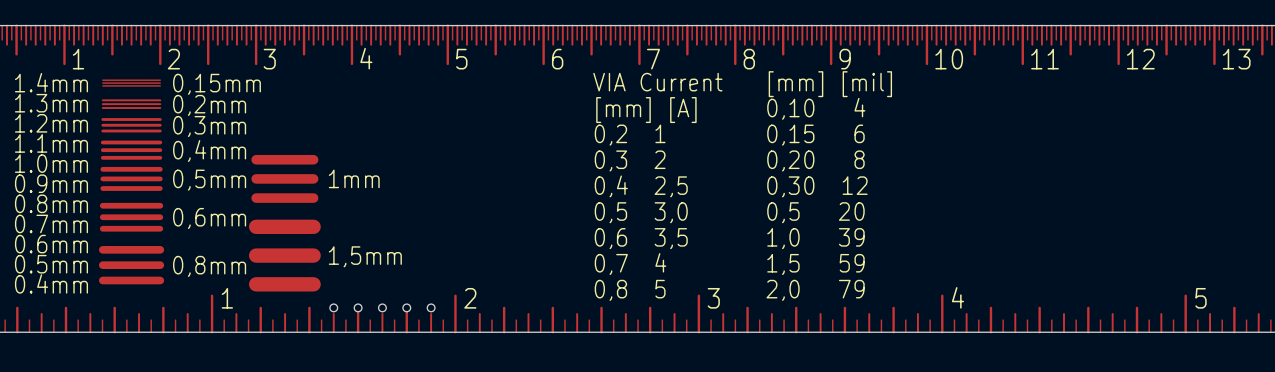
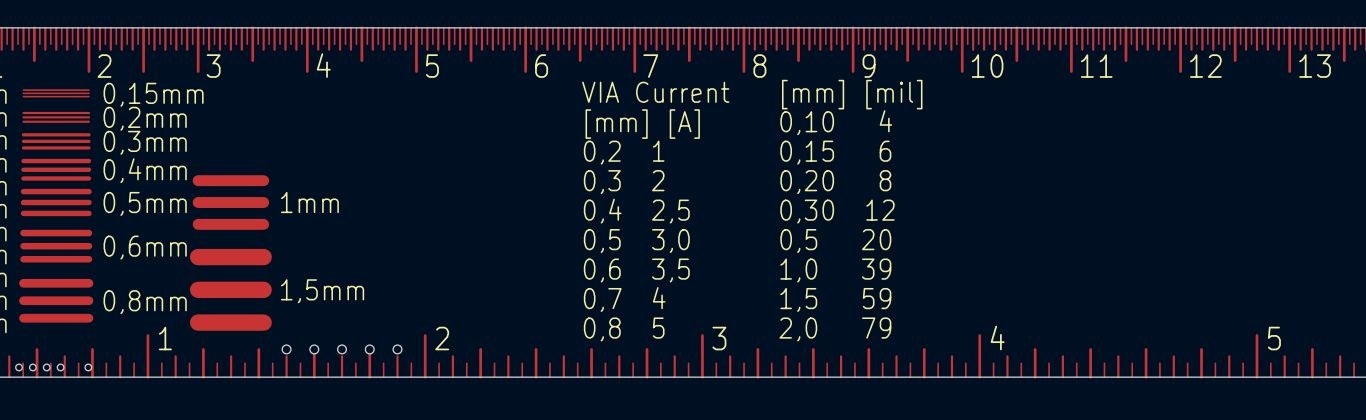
hole: none -> (19, 367)
hole: none -> (32, 367)
hole: none -> (46, 367)
hole: none -> (60, 367)
hole: none -> (88, 367)

